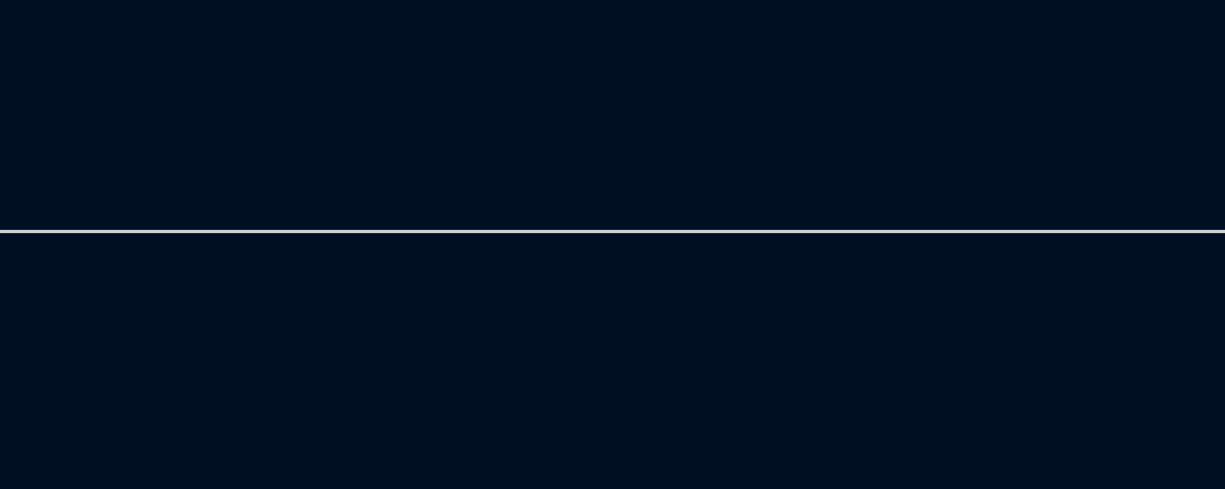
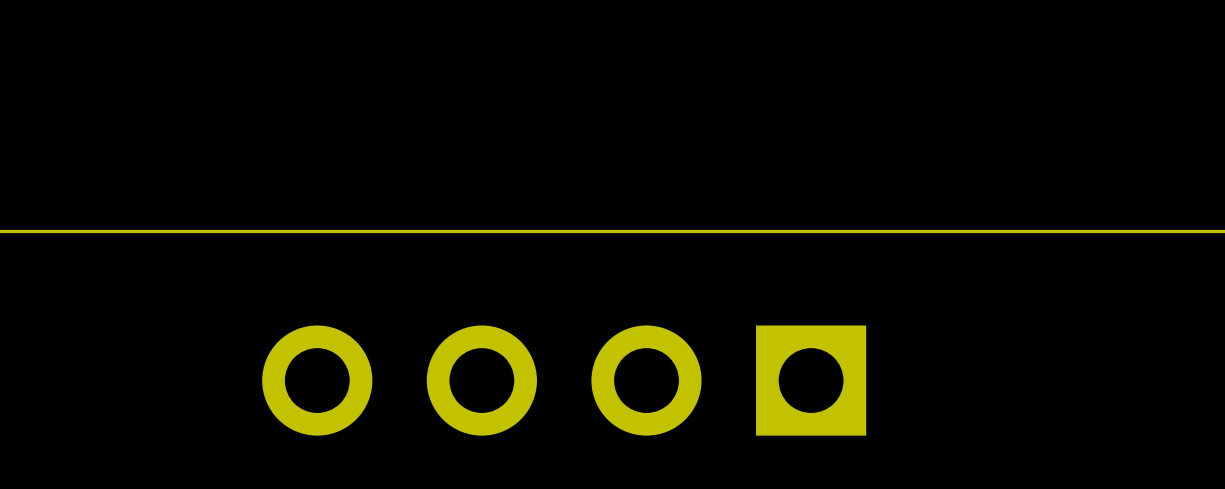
part: none -> (564, 380)

